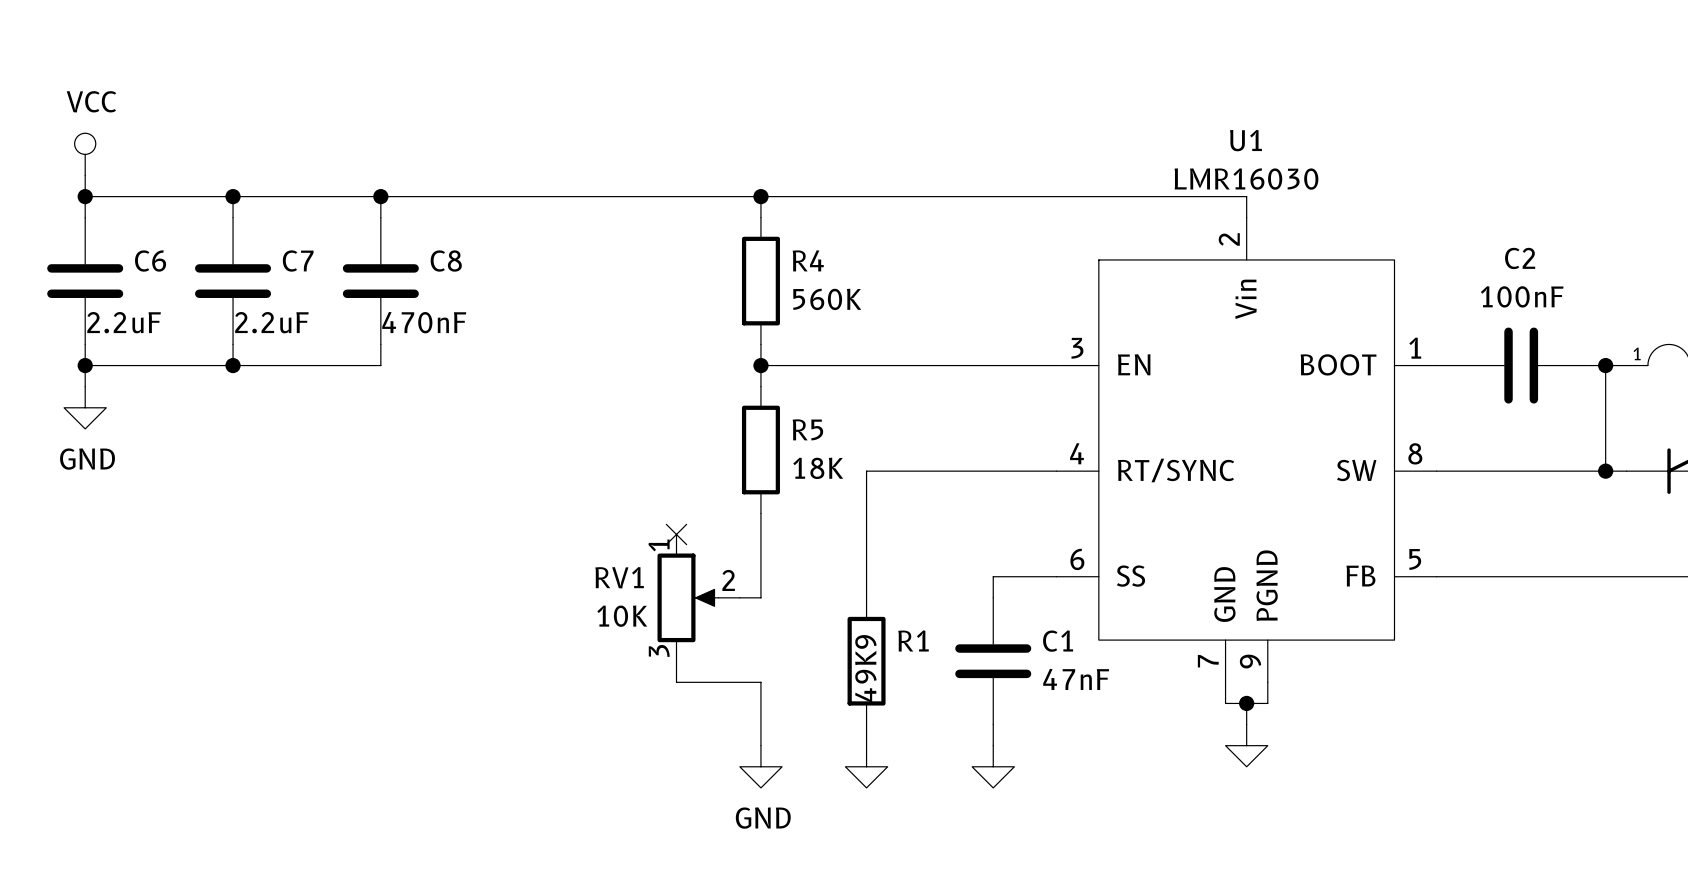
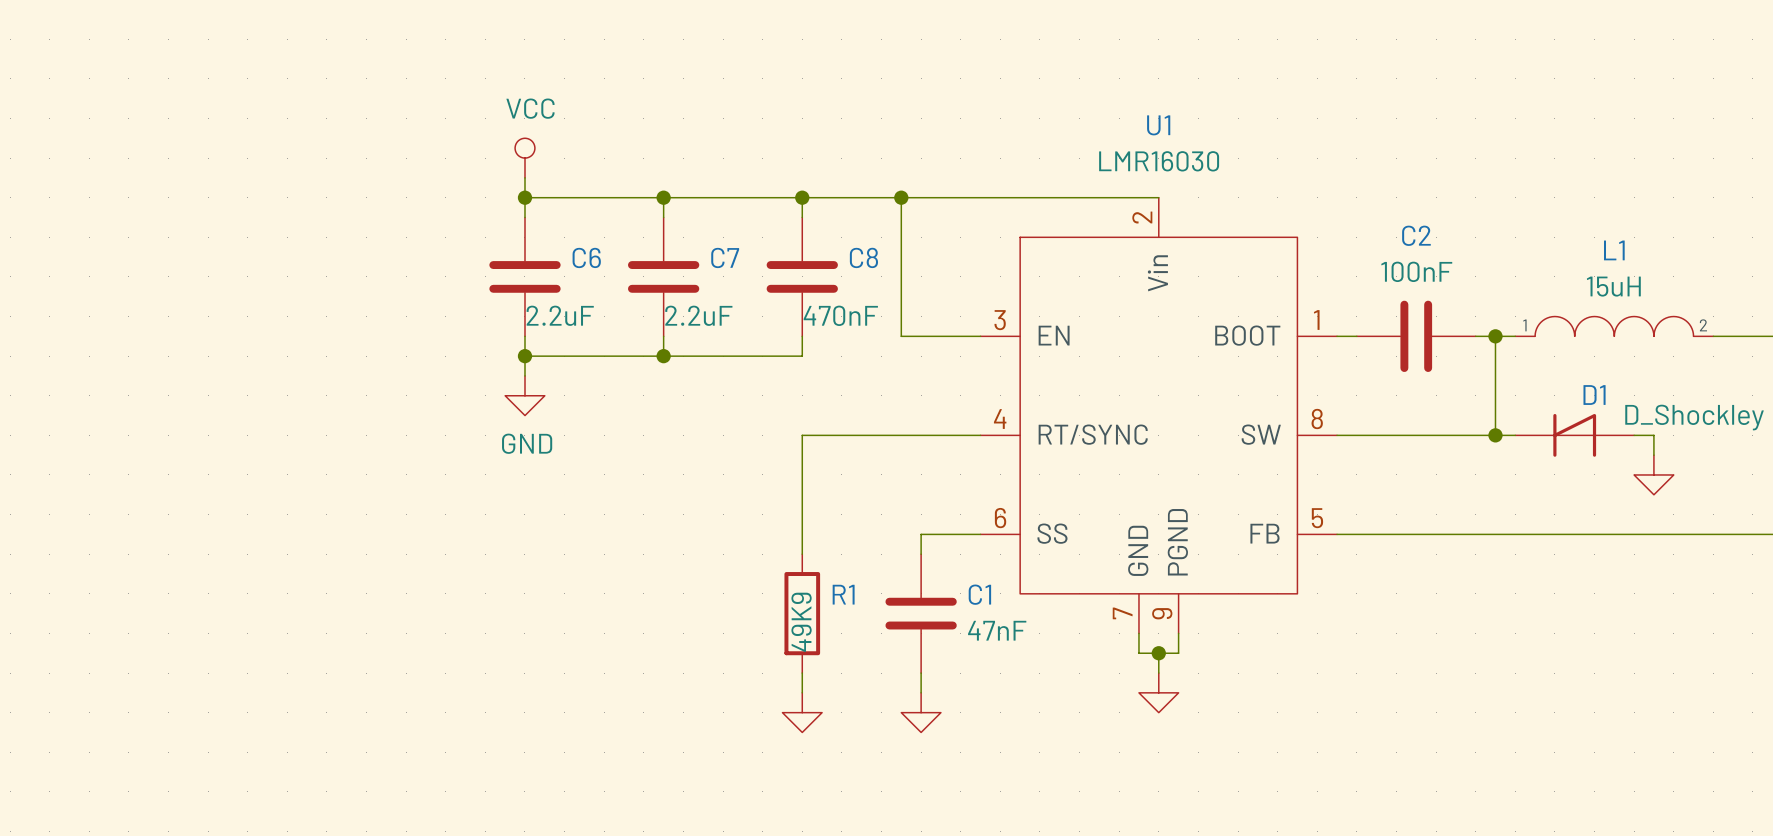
power symbol: VCC (85, 154) -> none
wire: (85, 175) (85, 217) -> none
power symbol: none -> VCC (524, 158)
wire: (85, 196) (1246, 196) (1246, 217) -> (524, 197) (1158, 197)
junction: (85, 196) -> none
wire: (233, 196) (233, 217) -> none
junction: (233, 196) -> none
wire: (380, 196) (380, 217) -> (663, 336) (663, 356)
junction: (380, 196) -> none
wire: none -> (524, 177) (524, 217)
wire: (760, 196) (760, 217) -> (663, 197) (663, 217)
junction position: (760, 196) -> (663, 197)
junction: none -> (524, 197)
wire: none -> (802, 197) (802, 217)
junction: none -> (802, 197)
junction: none -> (901, 197)
C6 position: (85, 281) -> (524, 276)
C7 position: (233, 281) -> (663, 276)
C8 position: (380, 281) -> (802, 276)
R4: 560K (760, 281) -> none
wire: (85, 344) (85, 386) -> none
wire: (233, 344) (233, 365) -> none
wire: (380, 344) (380, 365) (85, 365) -> none
wire: (760, 344) (760, 386) -> (524, 336) (524, 375)
junction: (85, 365) -> none
junction: (233, 365) -> none
wire: (760, 365) (972, 365) -> (901, 197) (901, 336)
junction position: (760, 365) -> (663, 356)
wire: none -> (802, 336) (802, 356) (524, 356)
junction: none -> (524, 356)
power symbol: GND (85, 407) -> none
power symbol: none -> GND (524, 395)
R5: 18K (760, 450) -> none
wire: (760, 513) (760, 597) (739, 597) -> none
no-connect mark: (676, 534) -> none
RV1: 10K (698, 597) -> none
wire: (676, 661) (676, 682) (760, 682) (760, 745) -> none
power symbol: GND (760, 766) -> none

